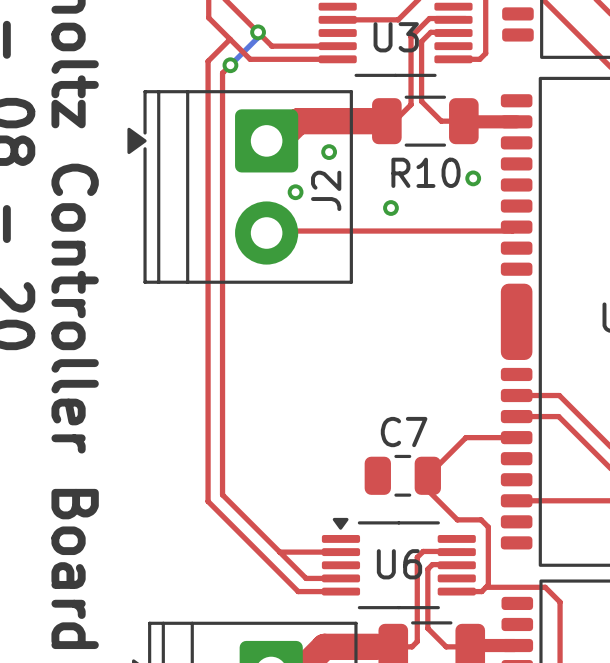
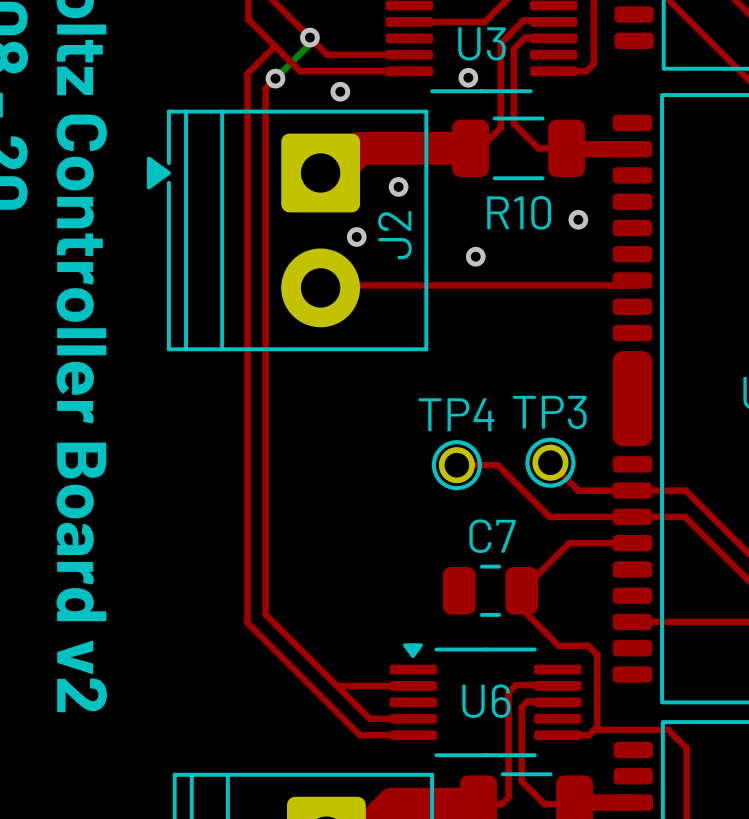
via: none -> (468, 77)
via: none -> (340, 91)
top track: none -> (550, 462) (578, 490) (632, 490)
TP3: none -> (550, 462)
top track: none -> (456, 465) (497, 465) (549, 516) (632, 516)
TP4: none -> (456, 465)

